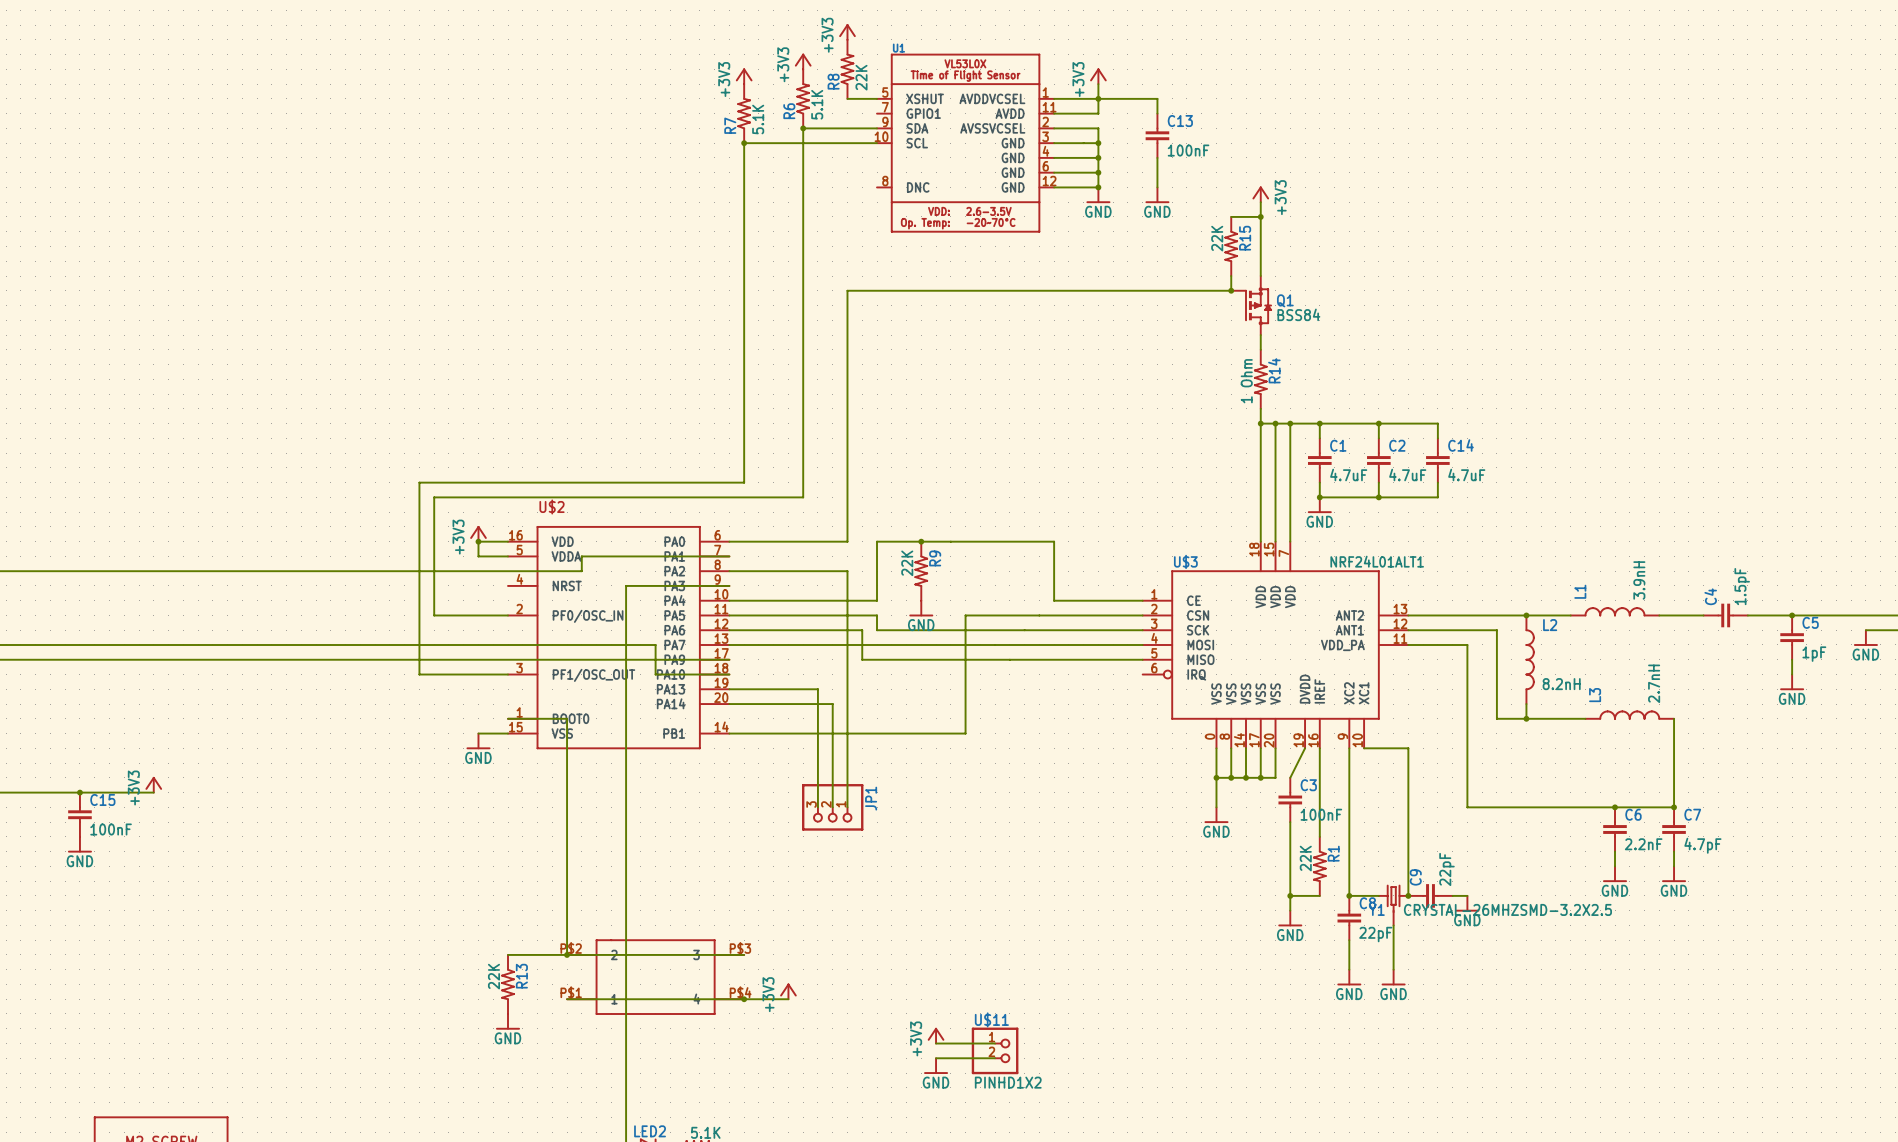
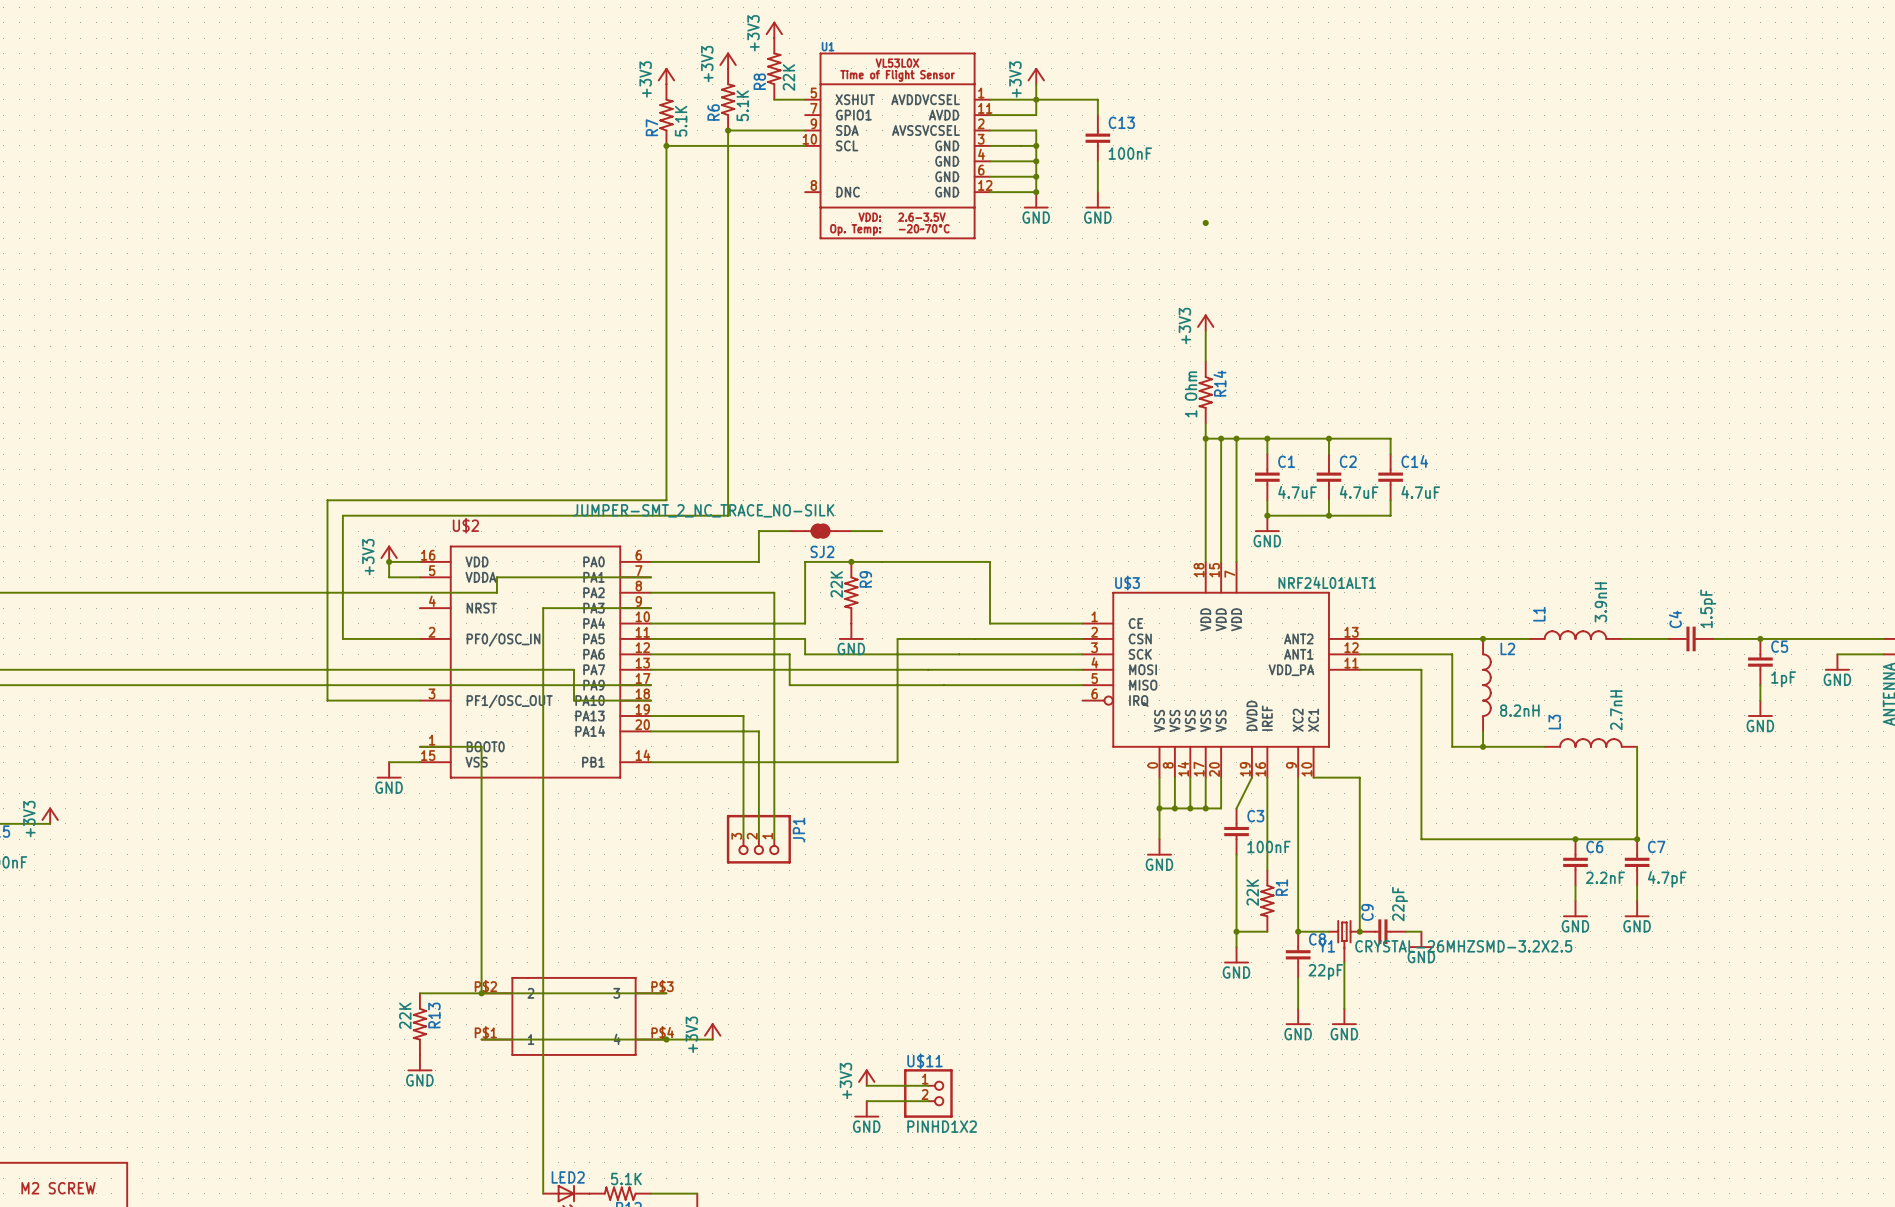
power symbol position: +3V3 (1260, 194) -> +3V3 (1205, 322)
power symbol text position: +3V3 (1280, 197) -> +3V3 (1184, 326)
wire: (1260, 202) (1260, 276) -> none
wire: (1231, 216) (1260, 216) -> none
R15: 22K (1231, 246) -> none
wire: (1231, 276) (1231, 290) (847, 290) (847, 541) (832, 541) -> (789, 531) (758, 531) (758, 561)
junction: (1231, 290) -> none
Q1: BSS84 (1251, 305) -> none
SJ2: none -> JUMPER-SMT_2_NC_TRACE_NO-SILK (820, 531)
wire: none -> (851, 531) (882, 531)

